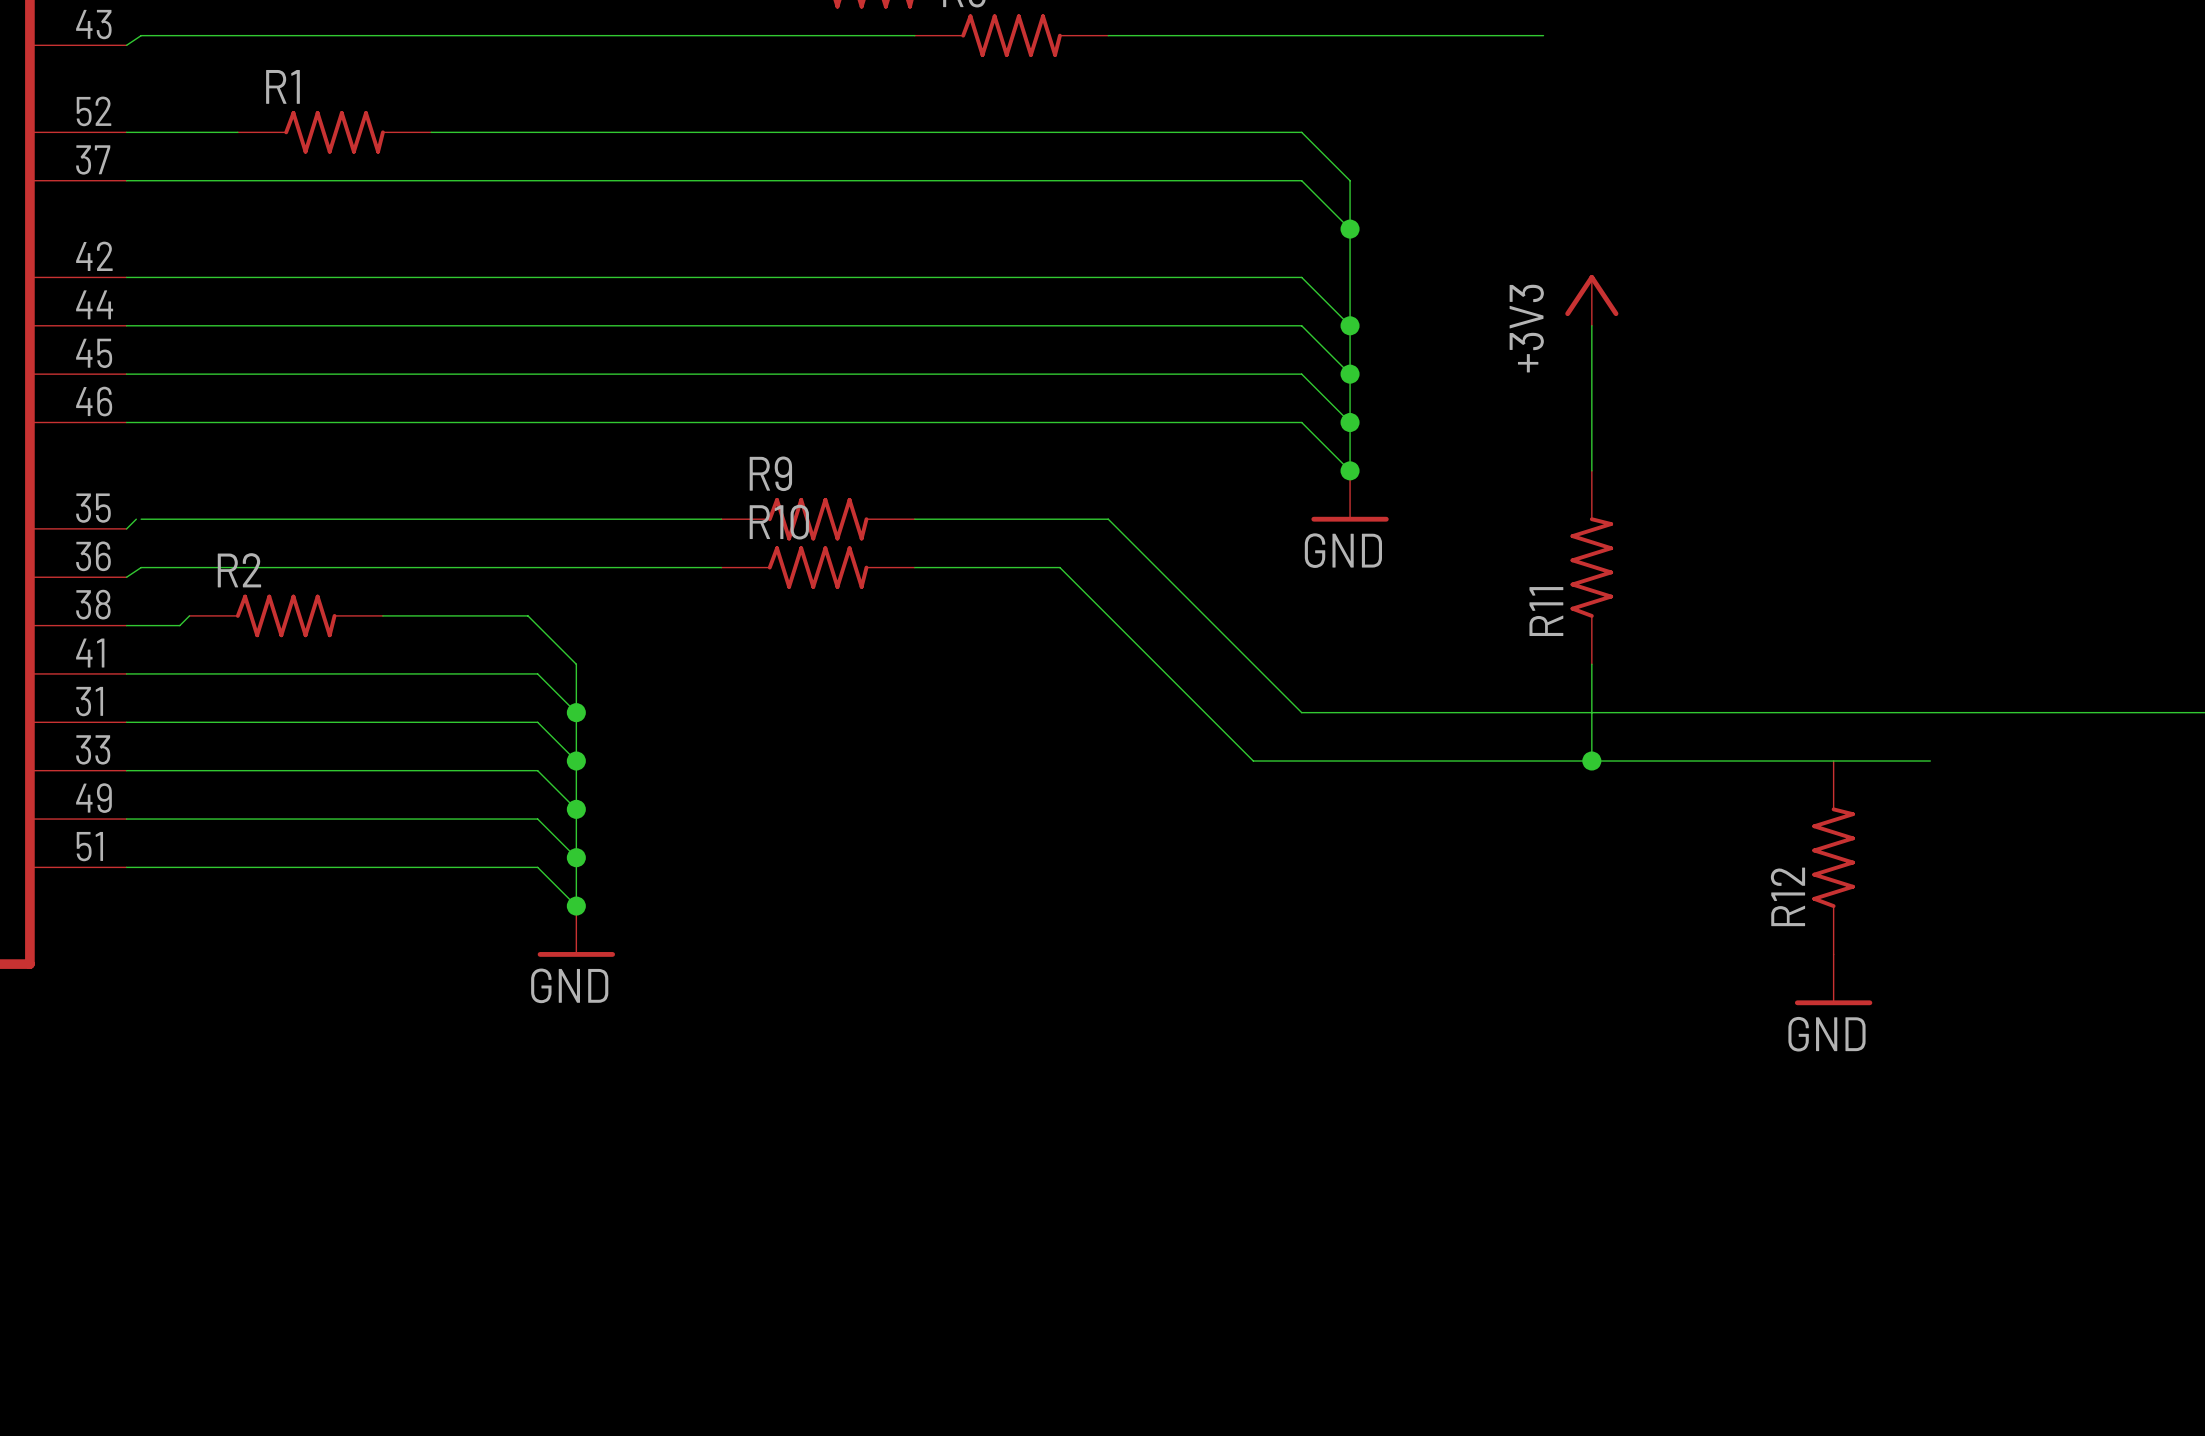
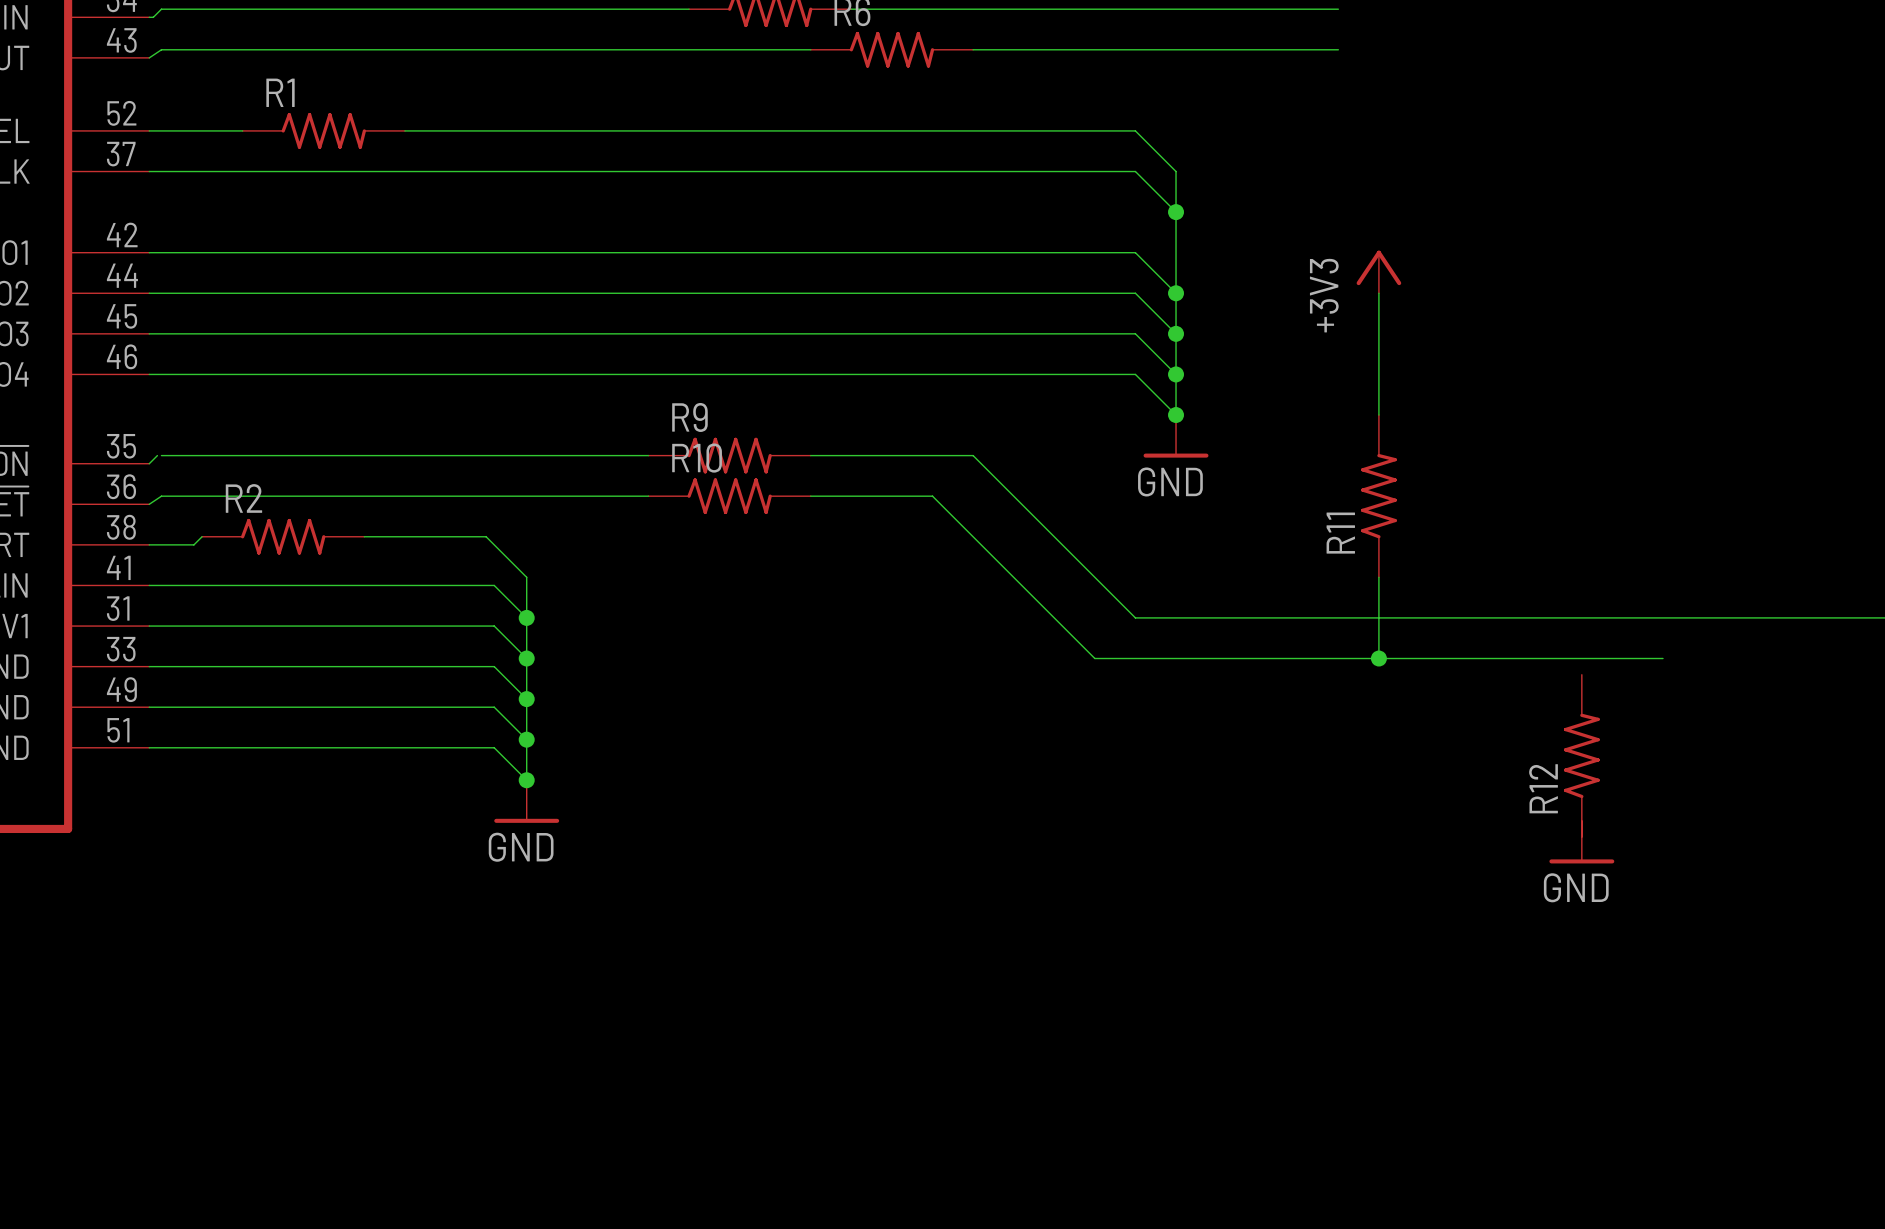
R12 position: (1833, 857) -> (1581, 755)

